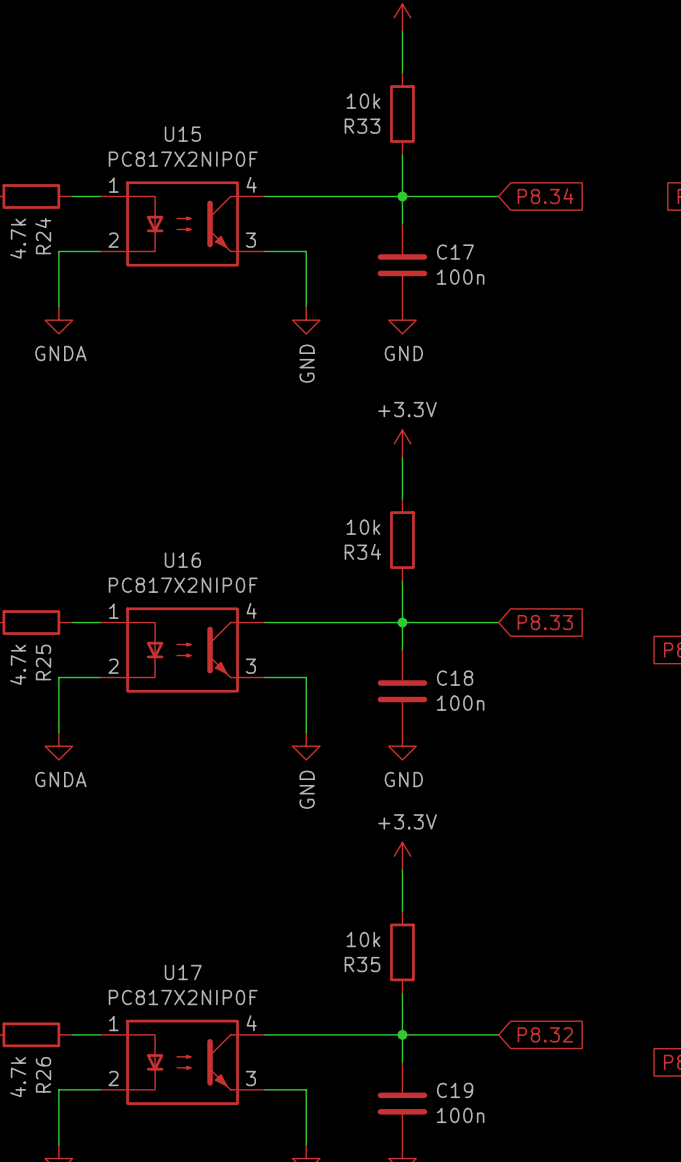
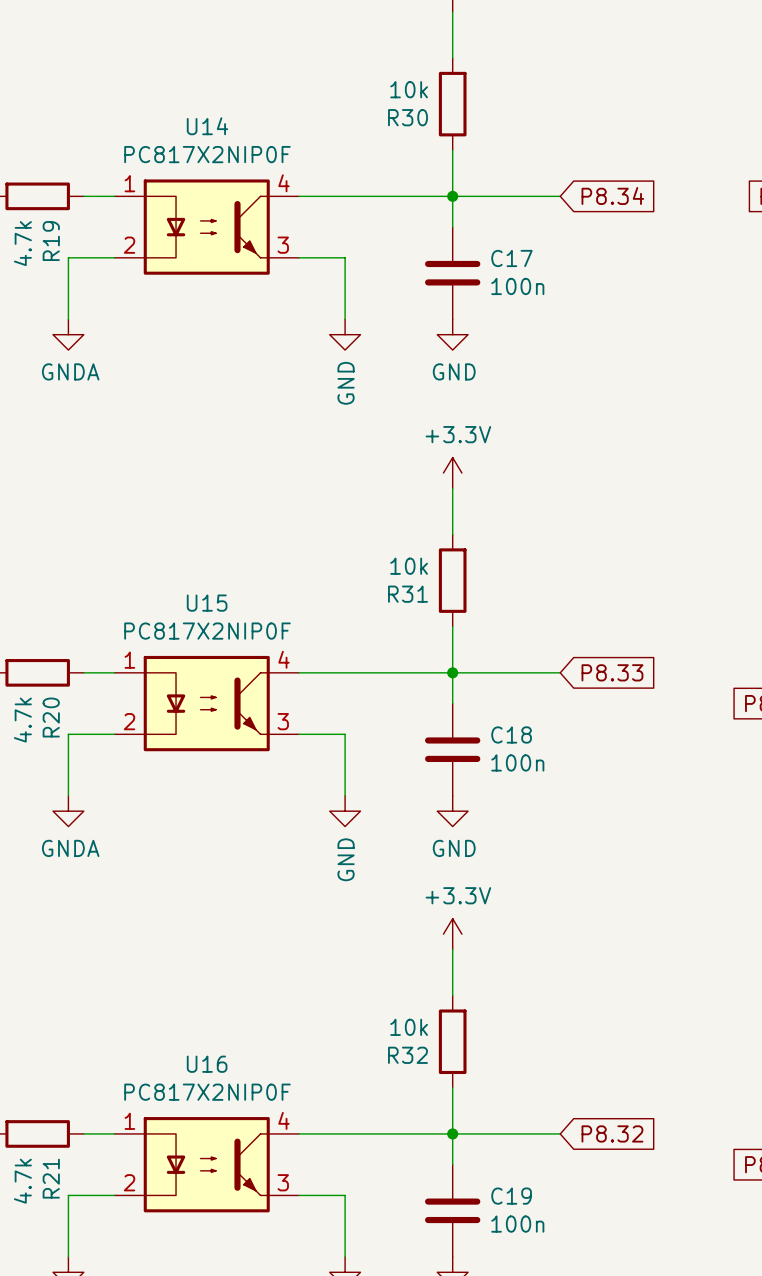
R33 name: R33 (362, 126) -> R30 (407, 117)
U15 name: U15 (182, 134) -> U14 (207, 126)
R24 name: R24 (43, 236) -> R19 (51, 241)
R34 name: R34 (362, 551) -> R31 (407, 594)
U16 name: U16 (182, 560) -> U15 (207, 603)
R25 name: R25 (43, 662) -> R20 (51, 717)
R35 name: R35 (362, 964) -> R32 (407, 1055)
U17 name: U17 (183, 972) -> U16 (207, 1064)
R26 name: R26 (43, 1074) -> R21 (51, 1178)

